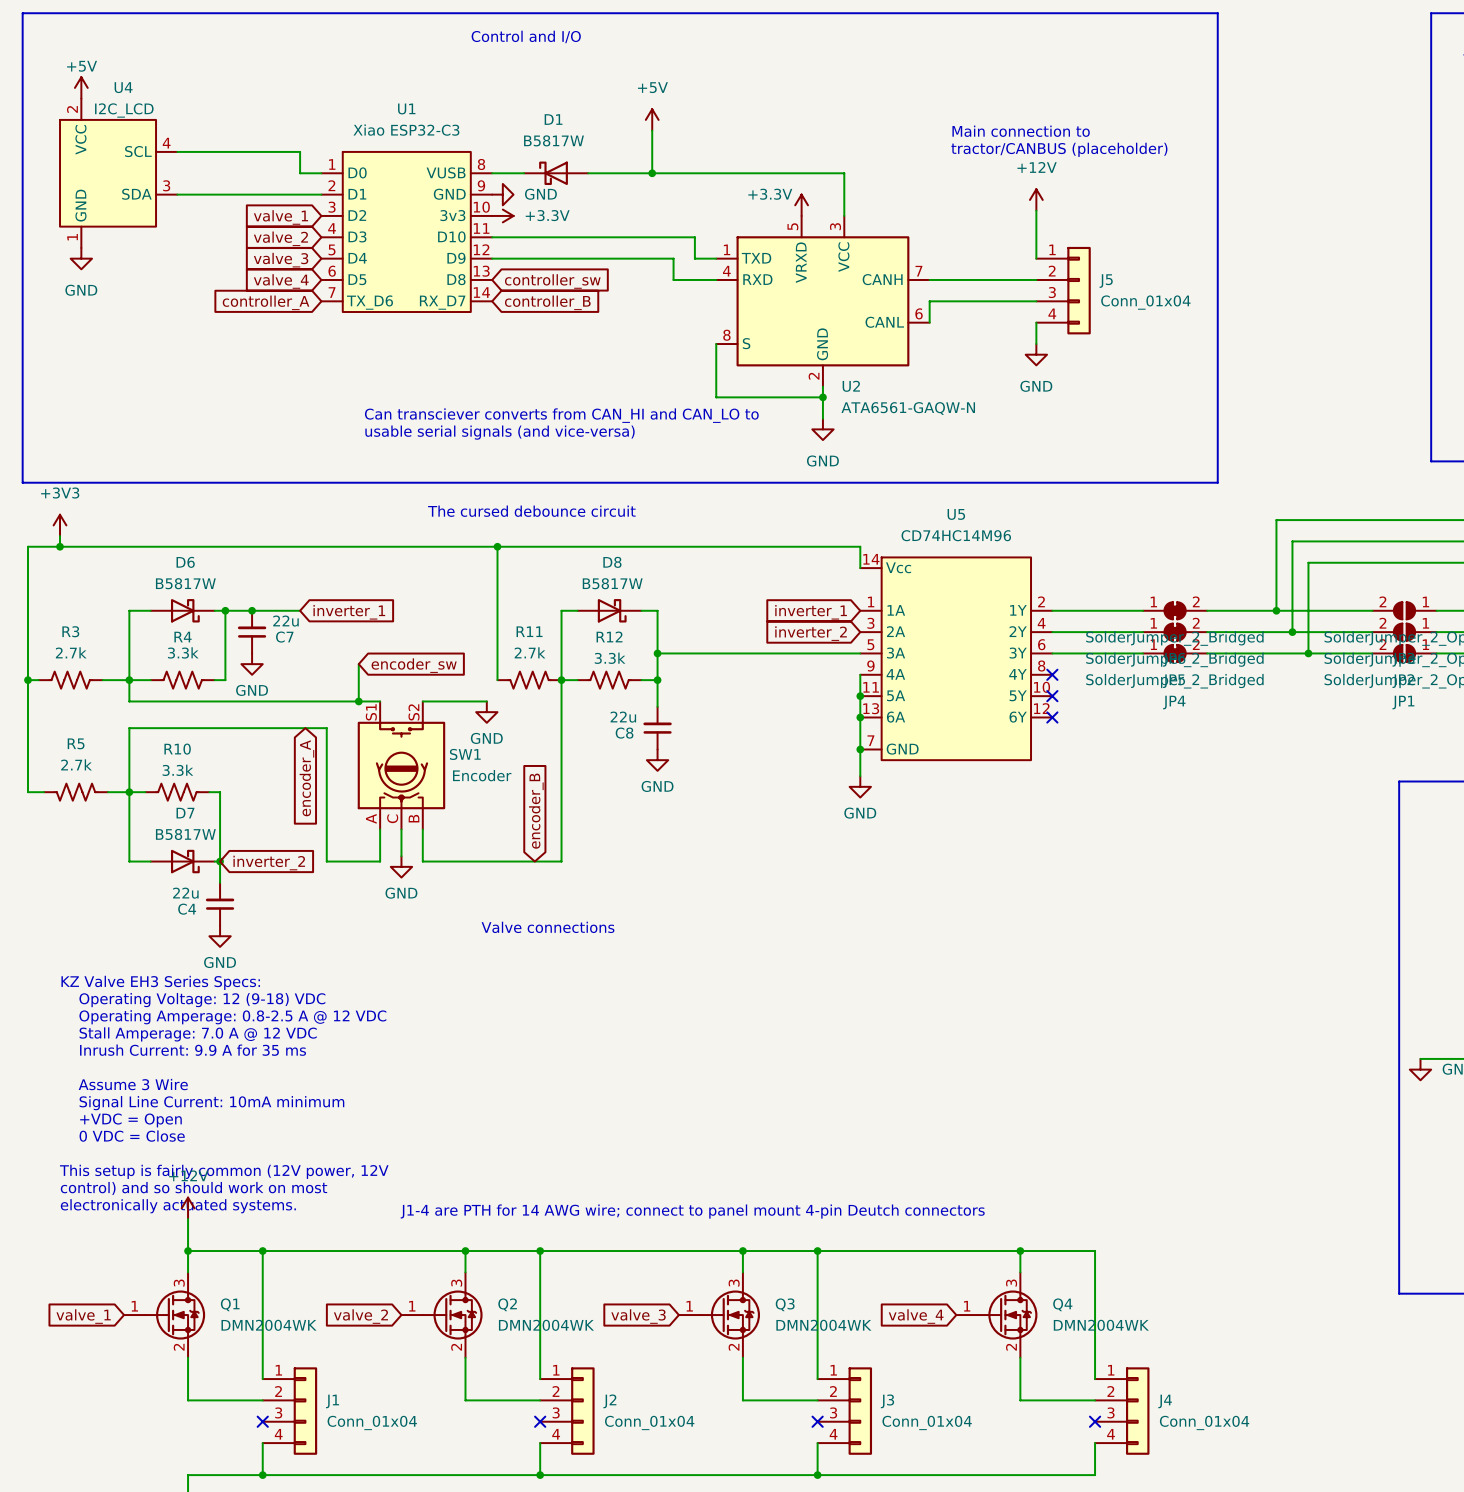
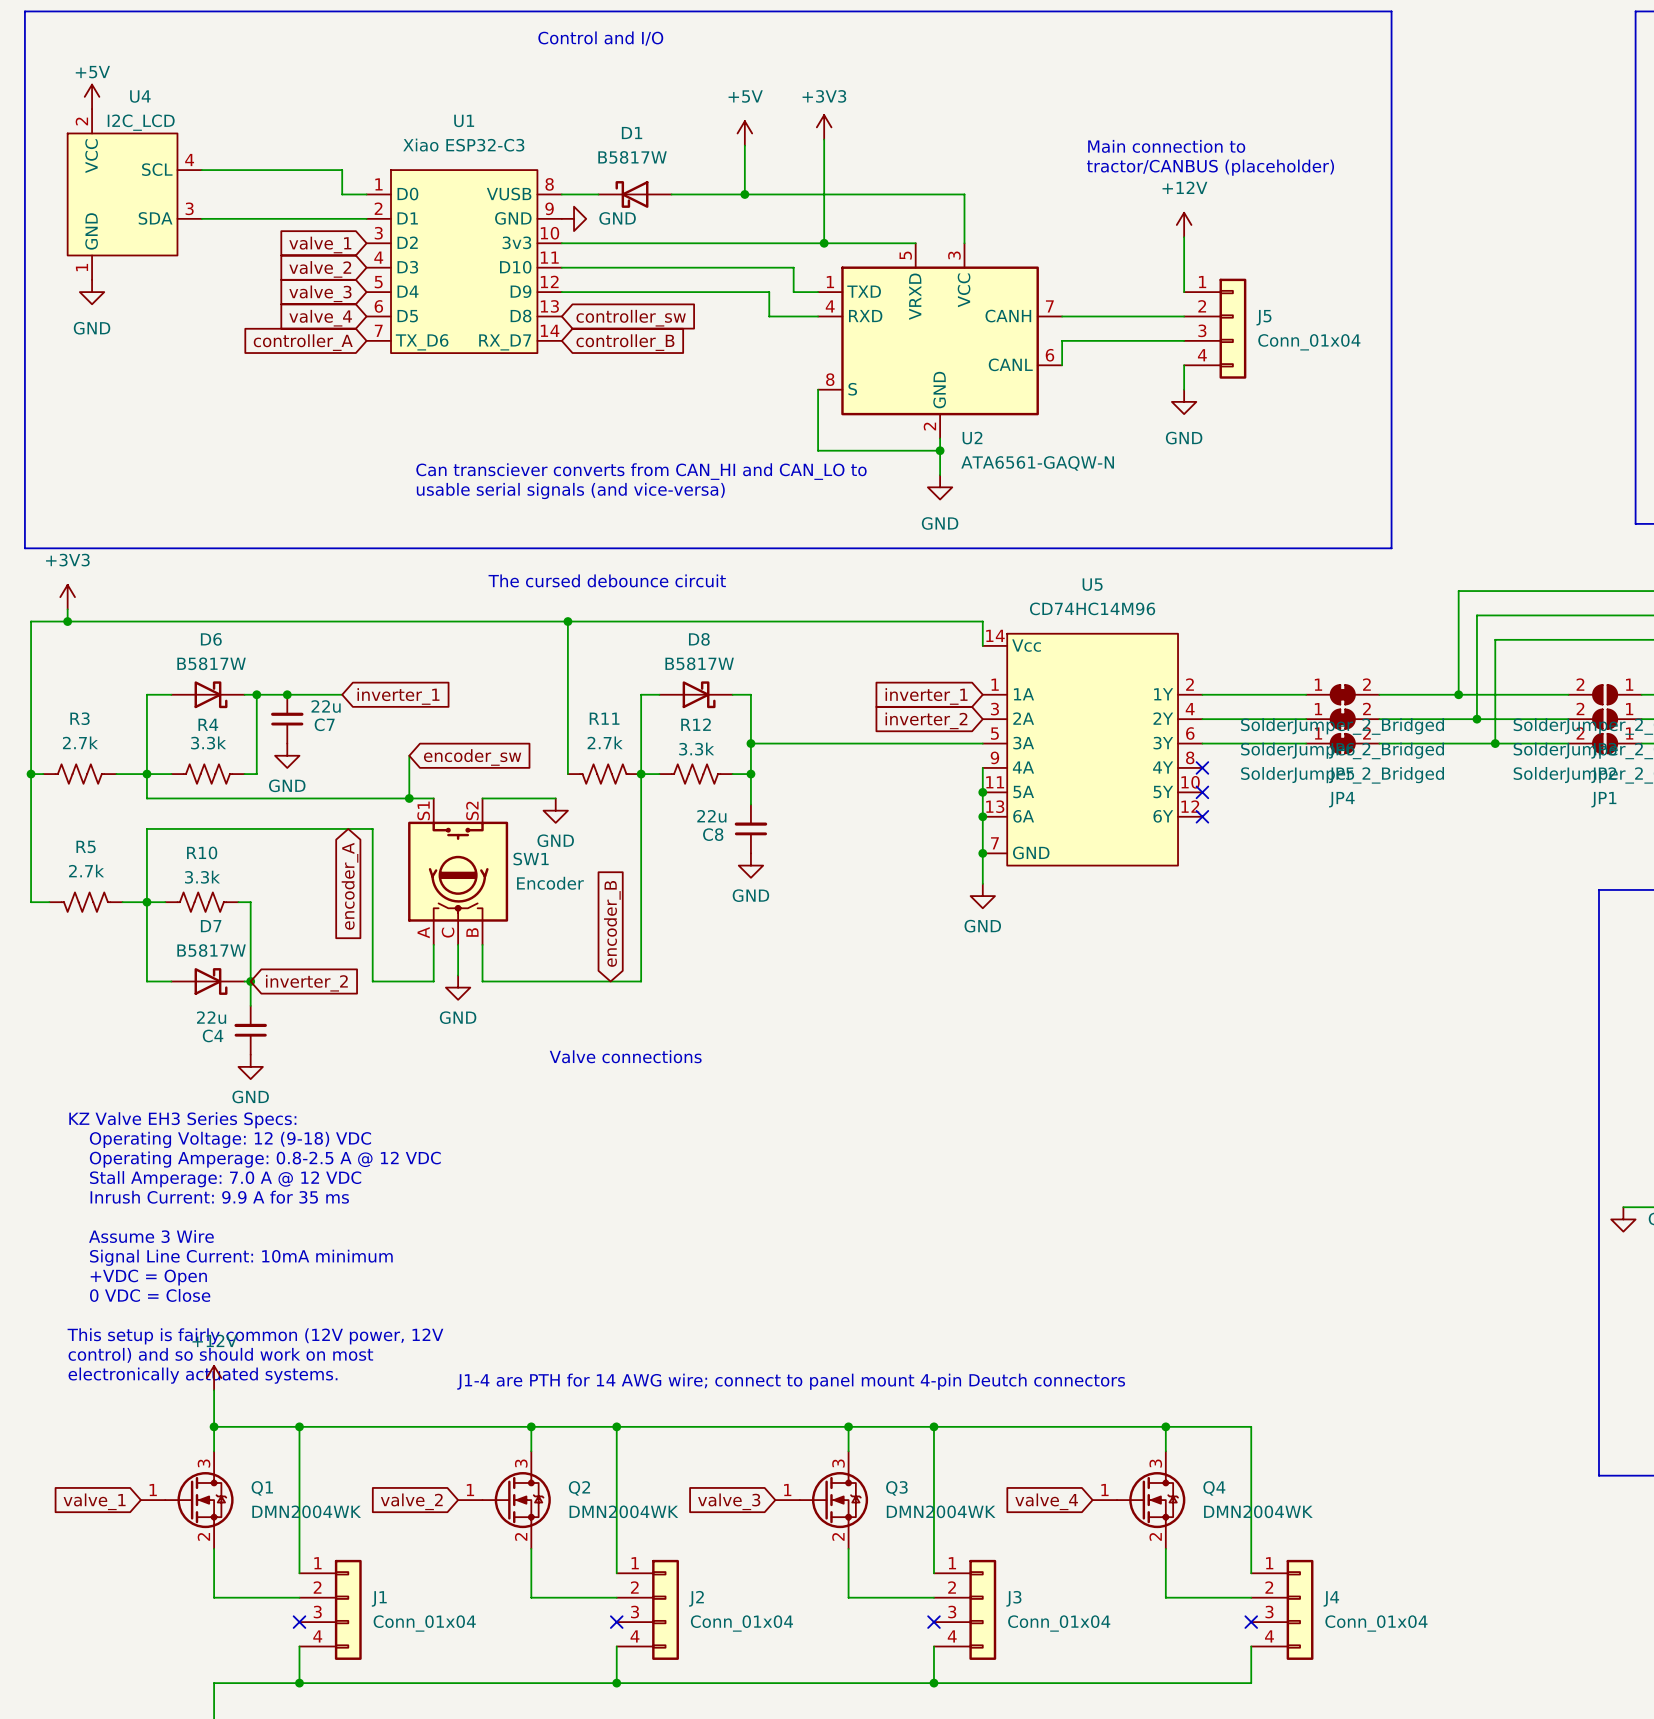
power symbol: none -> +3V3 (824, 127)
wire: none -> (824, 139) (824, 243)
power symbol: +3.3V (801, 205) -> none
wire: none -> (561, 243) (915, 243)
power symbol: +3.3V (502, 215) -> none
junction: none -> (824, 243)

